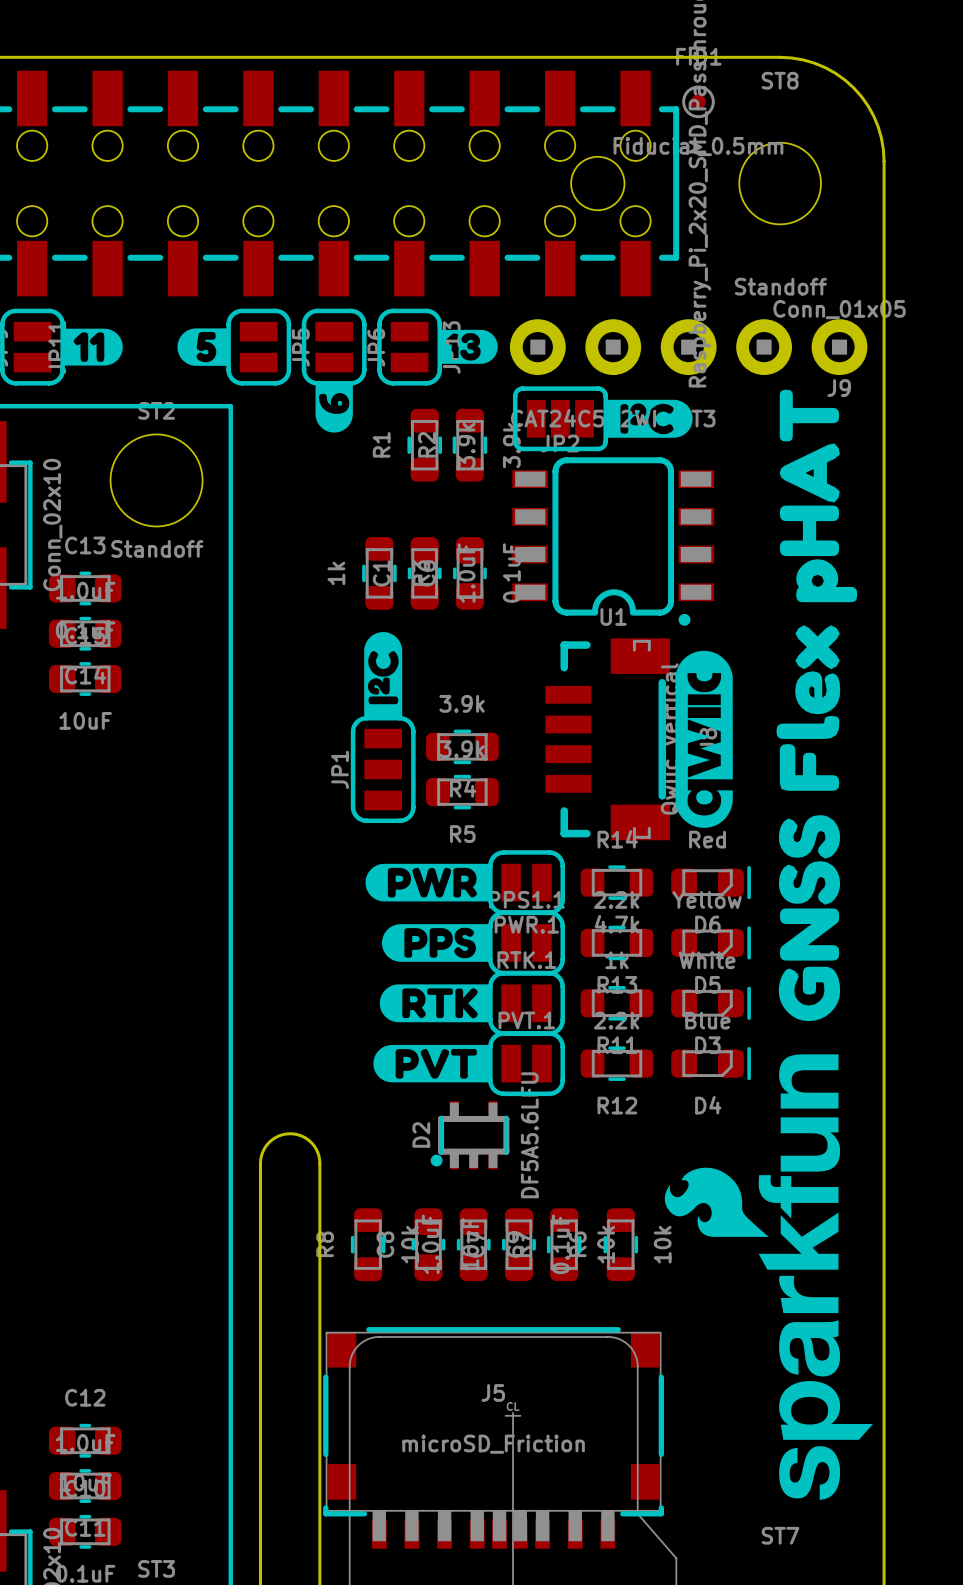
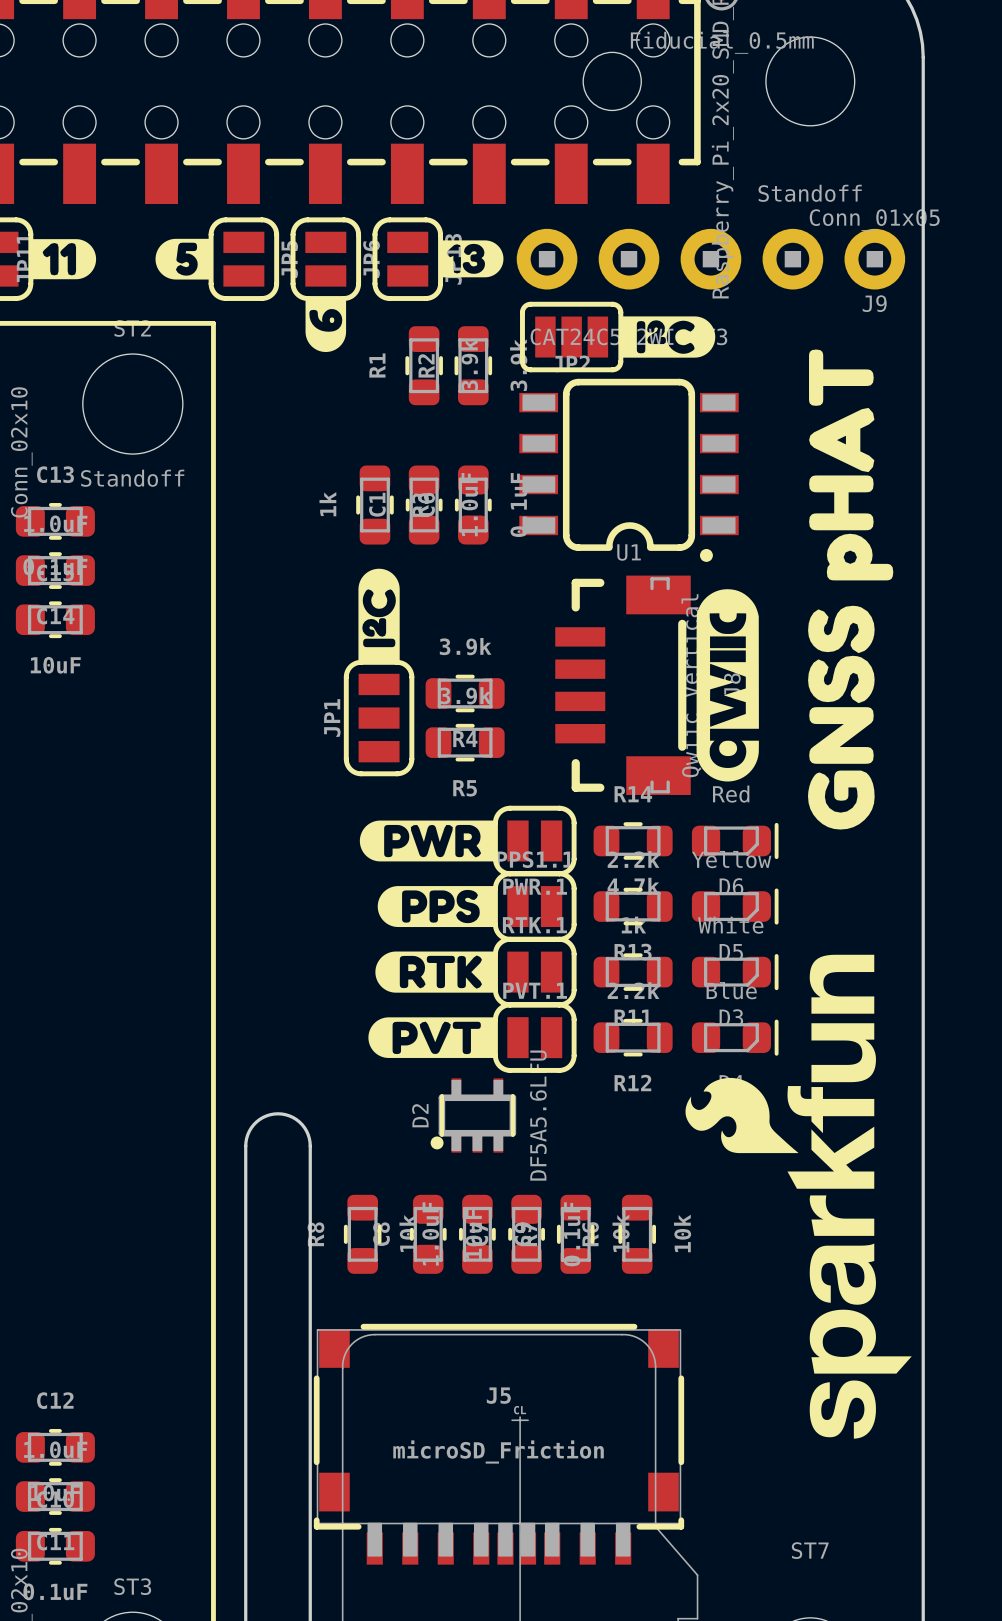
drawing: [776, 389, 858, 1022] -> none
drawing: none -> [807, 349, 894, 830]
drawing position: (768, 1277) -> (798, 1196)

